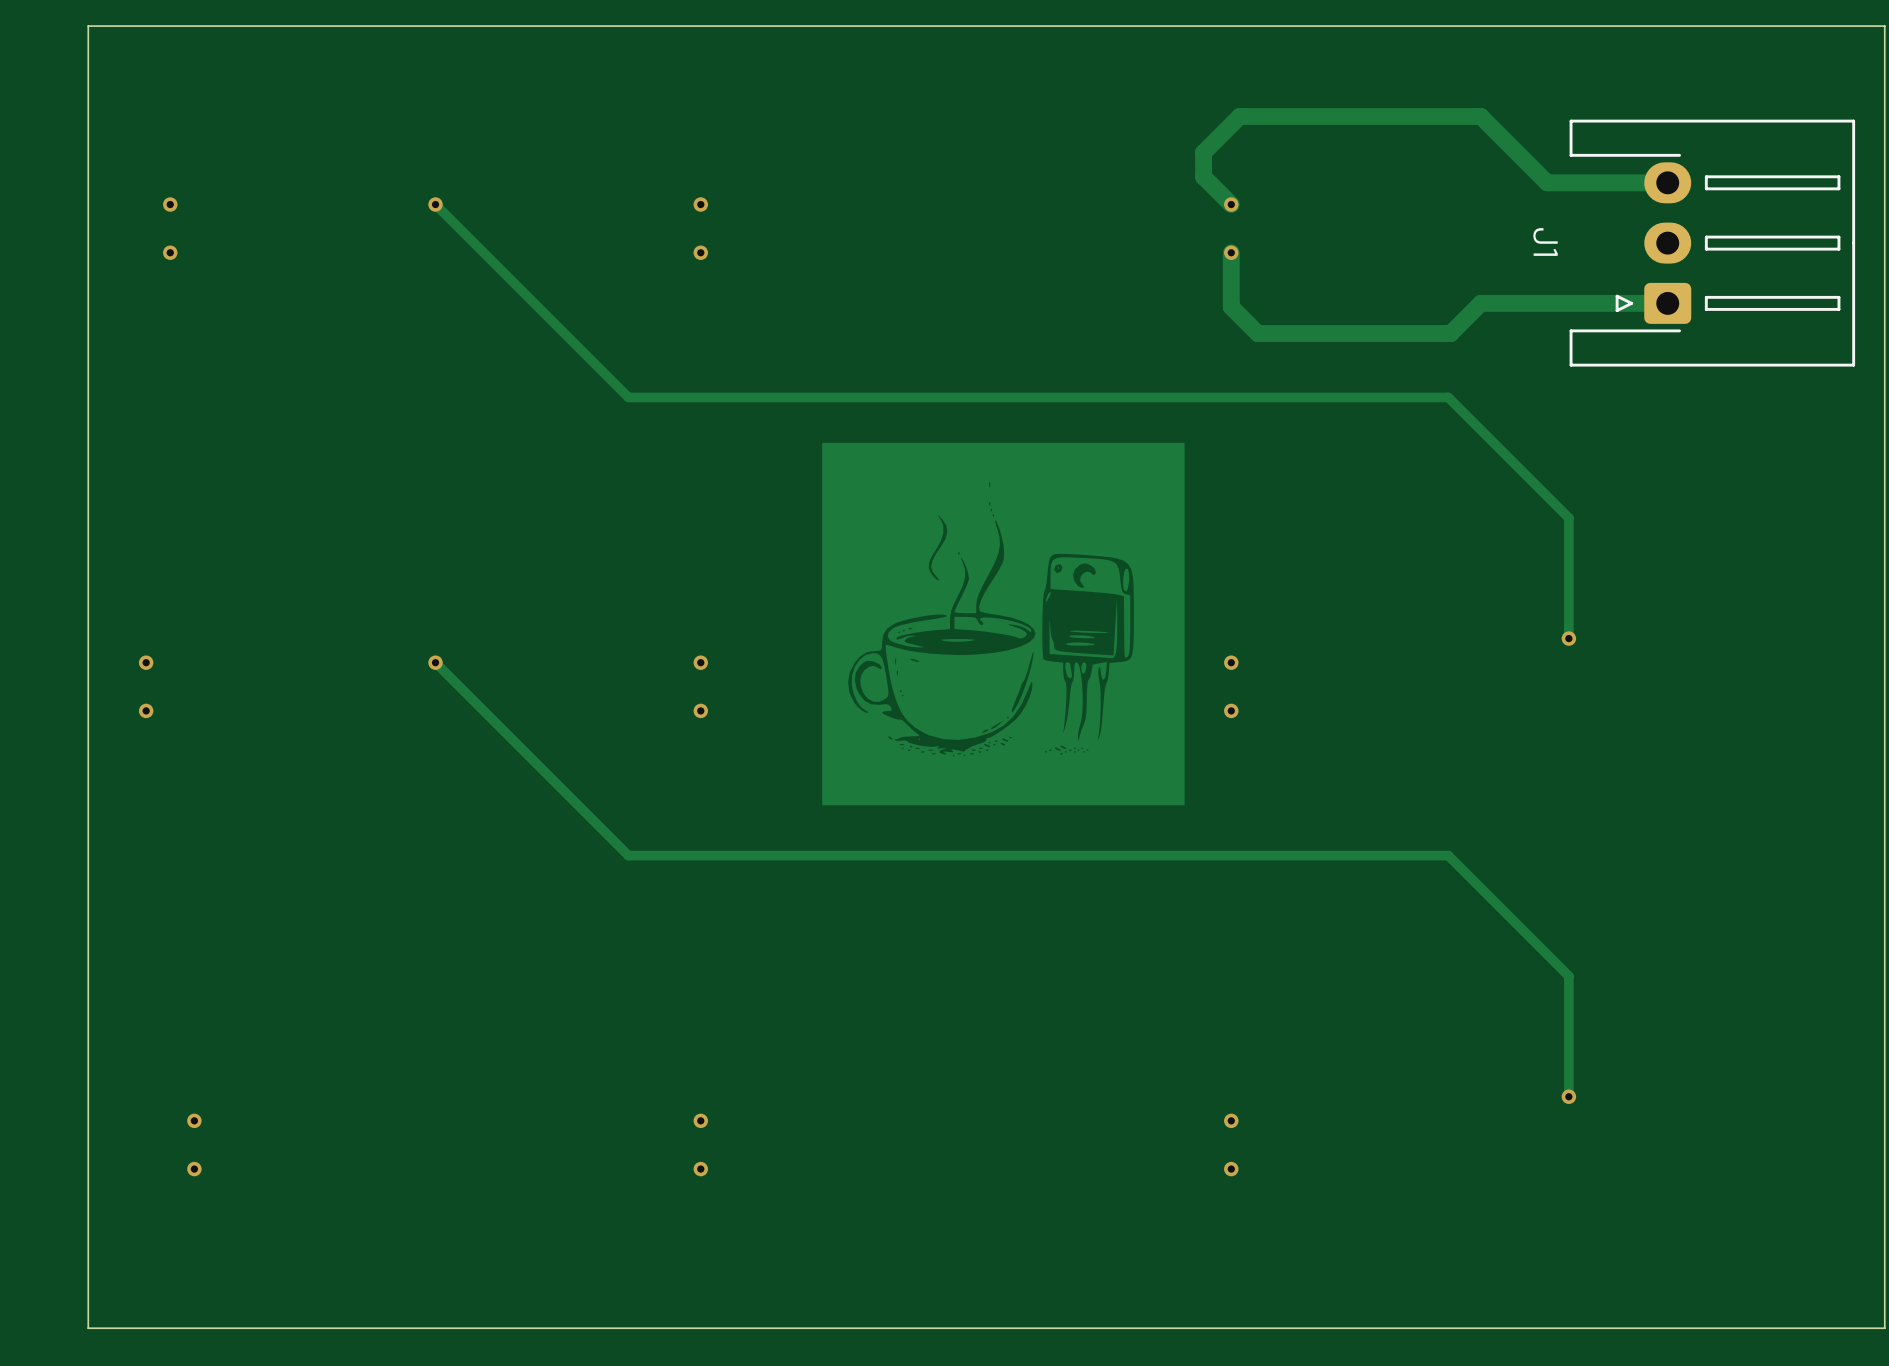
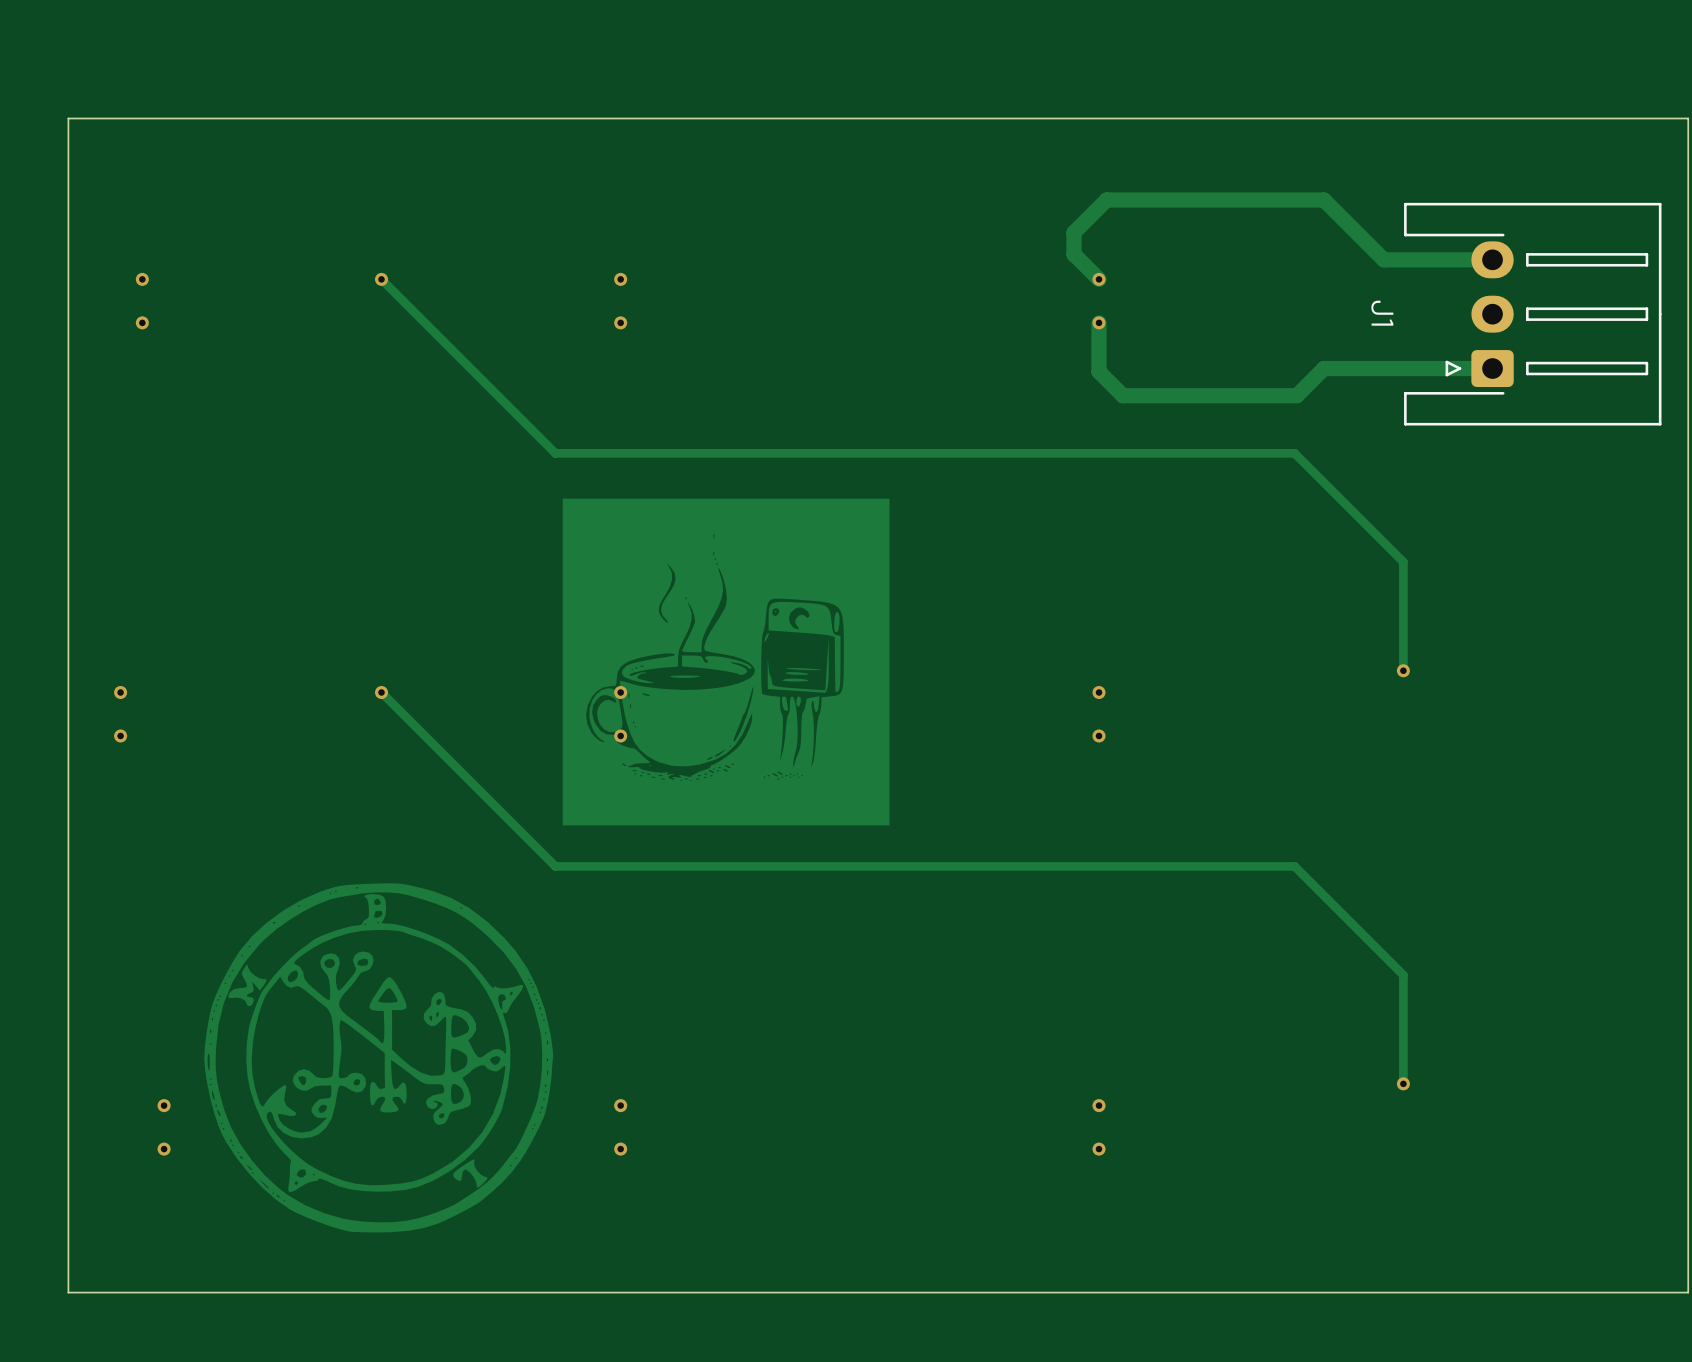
drawing position: (1003, 624) -> (726, 662)
drawing: none -> [204, 883, 554, 1233]

